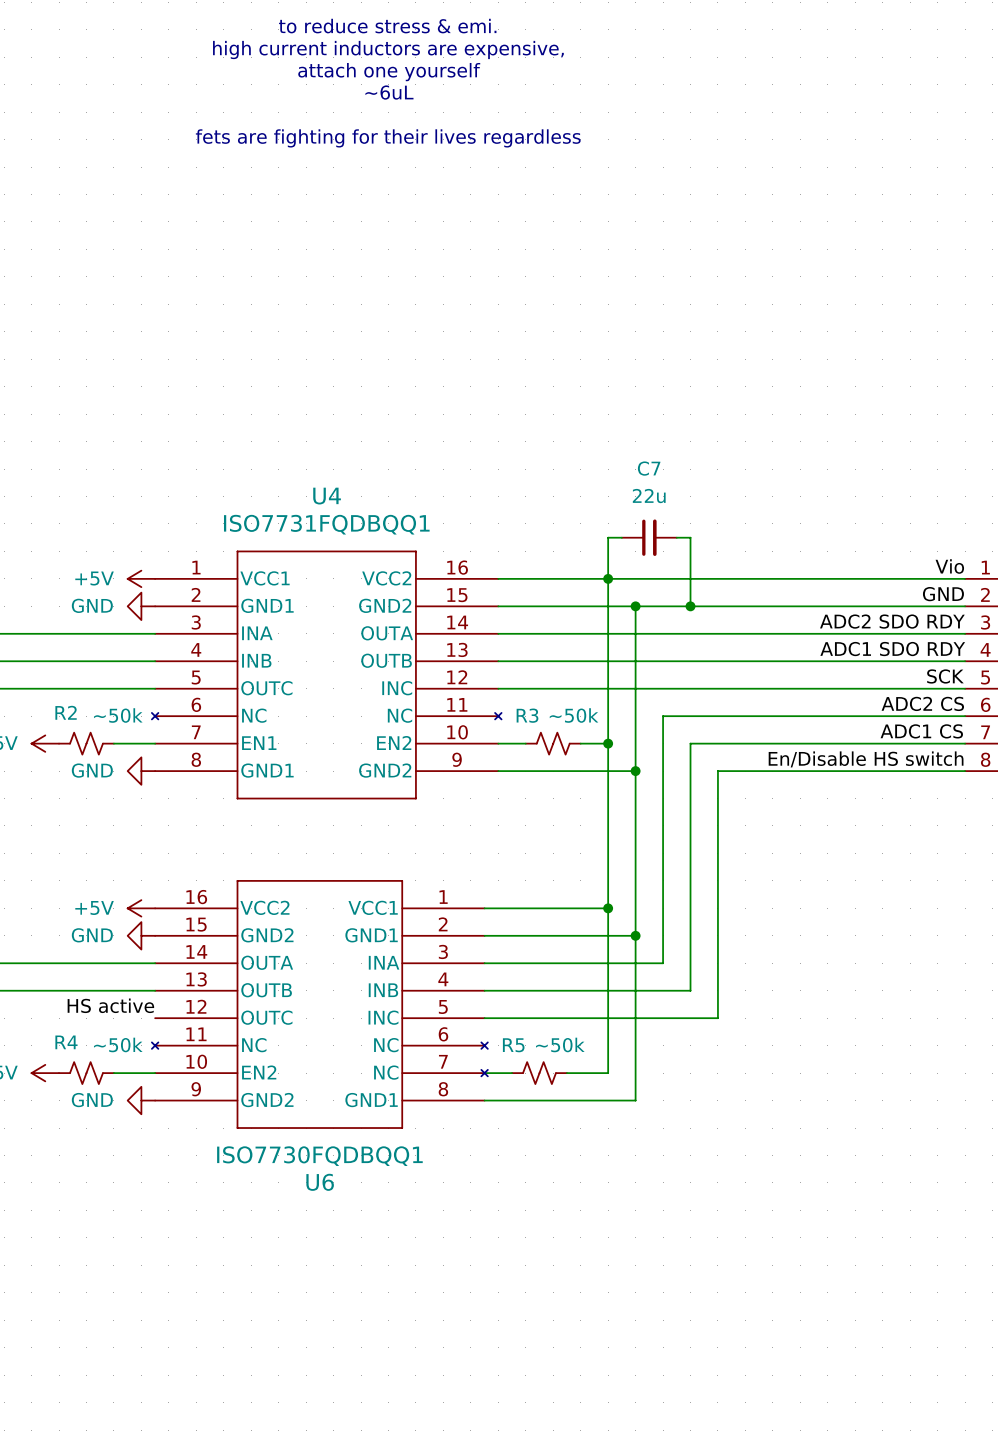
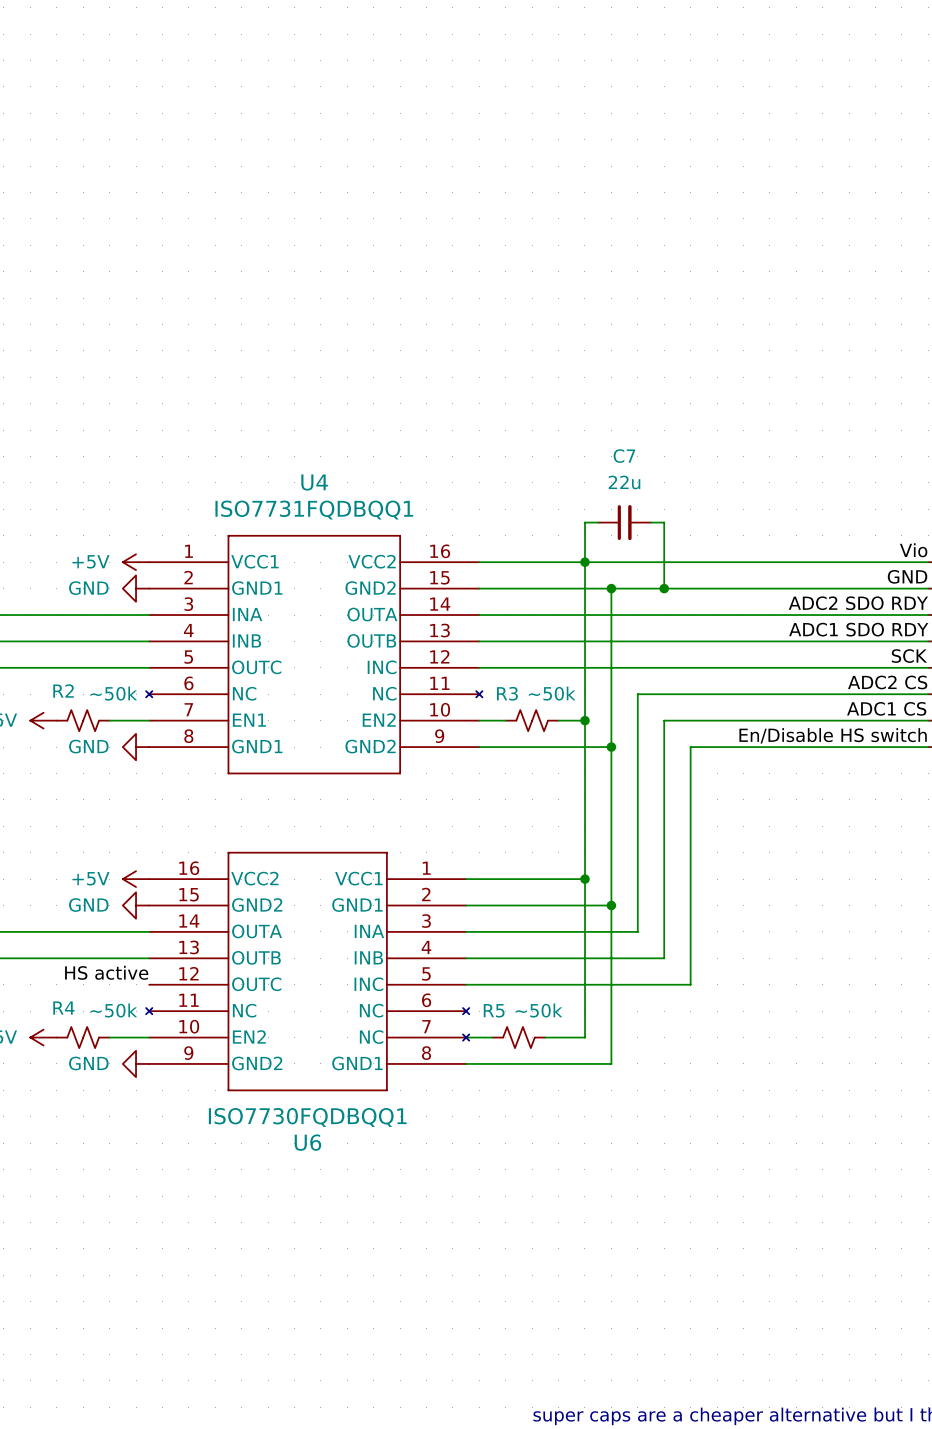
text: to reduce stress & emi. (387, 26) -> none
text: high current inductors are expensive, (388, 49) -> none
text: attach one yourself (389, 72) -> none
text: ~6uL (389, 92) -> none
text: fets are fighting for their lives regardless (388, 138) -> none

